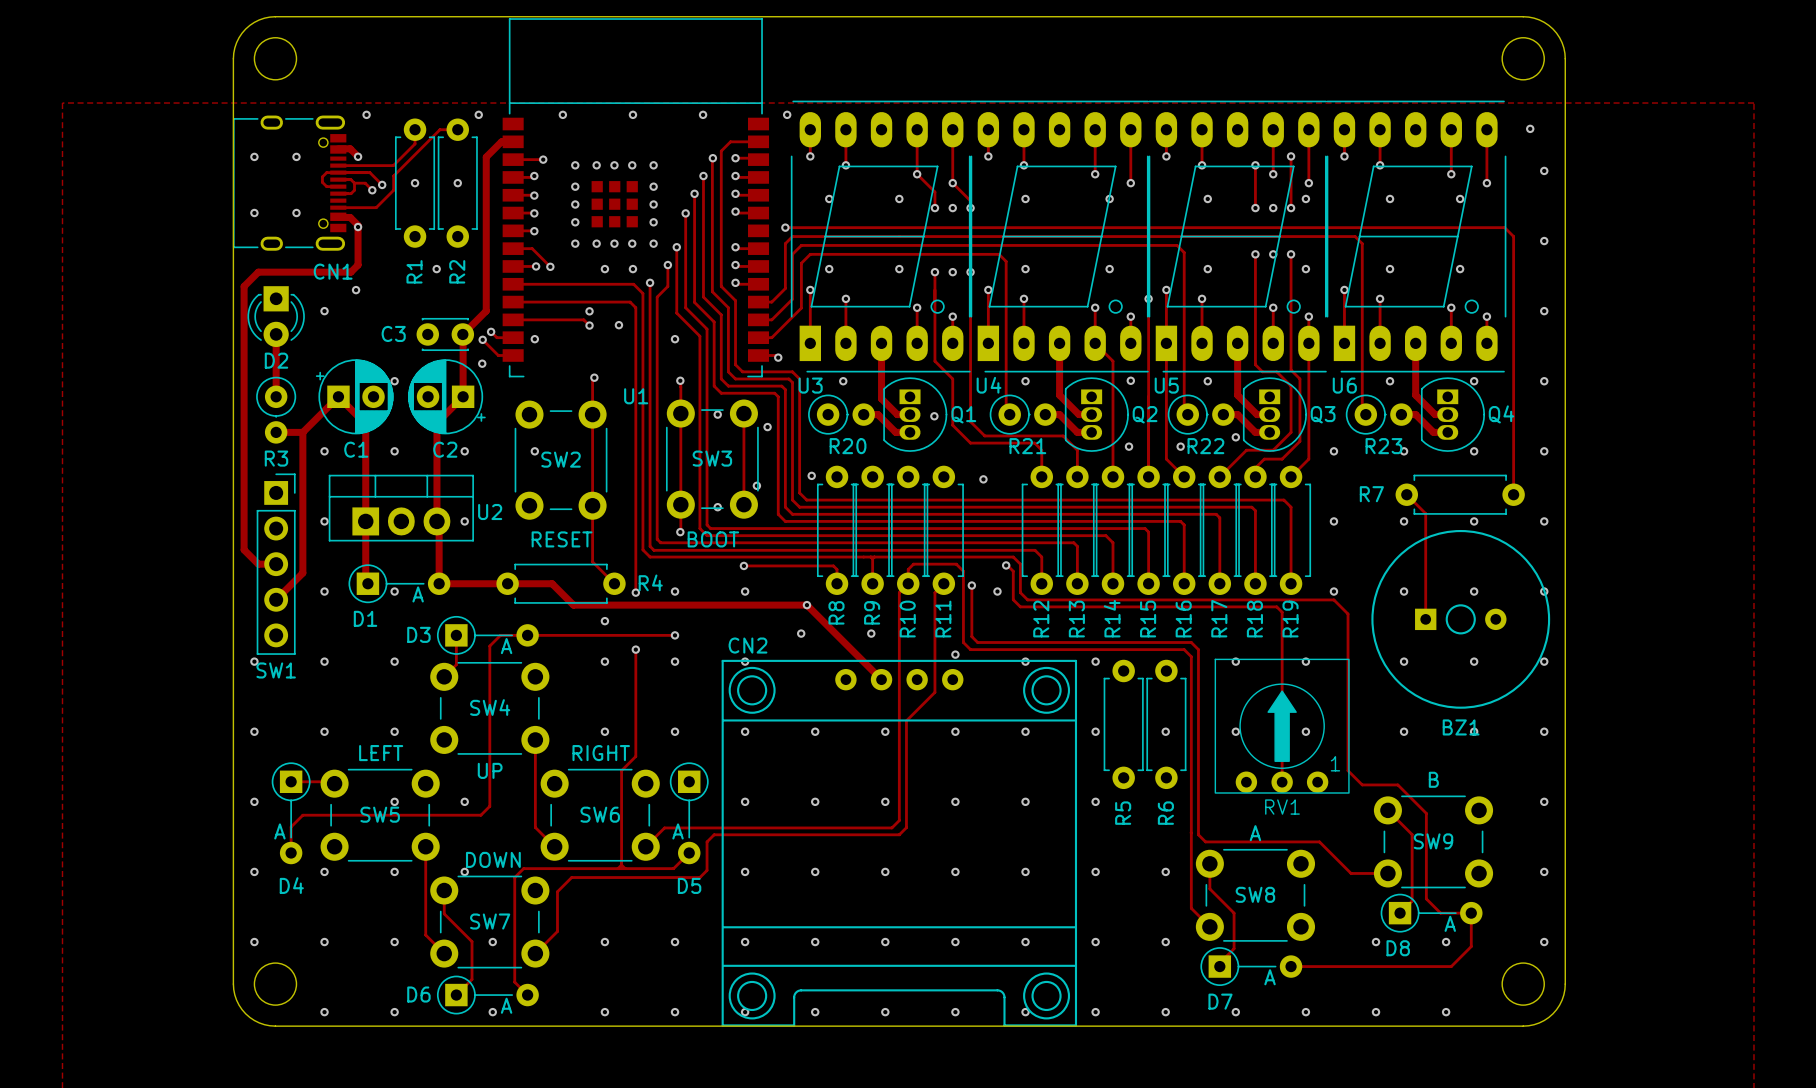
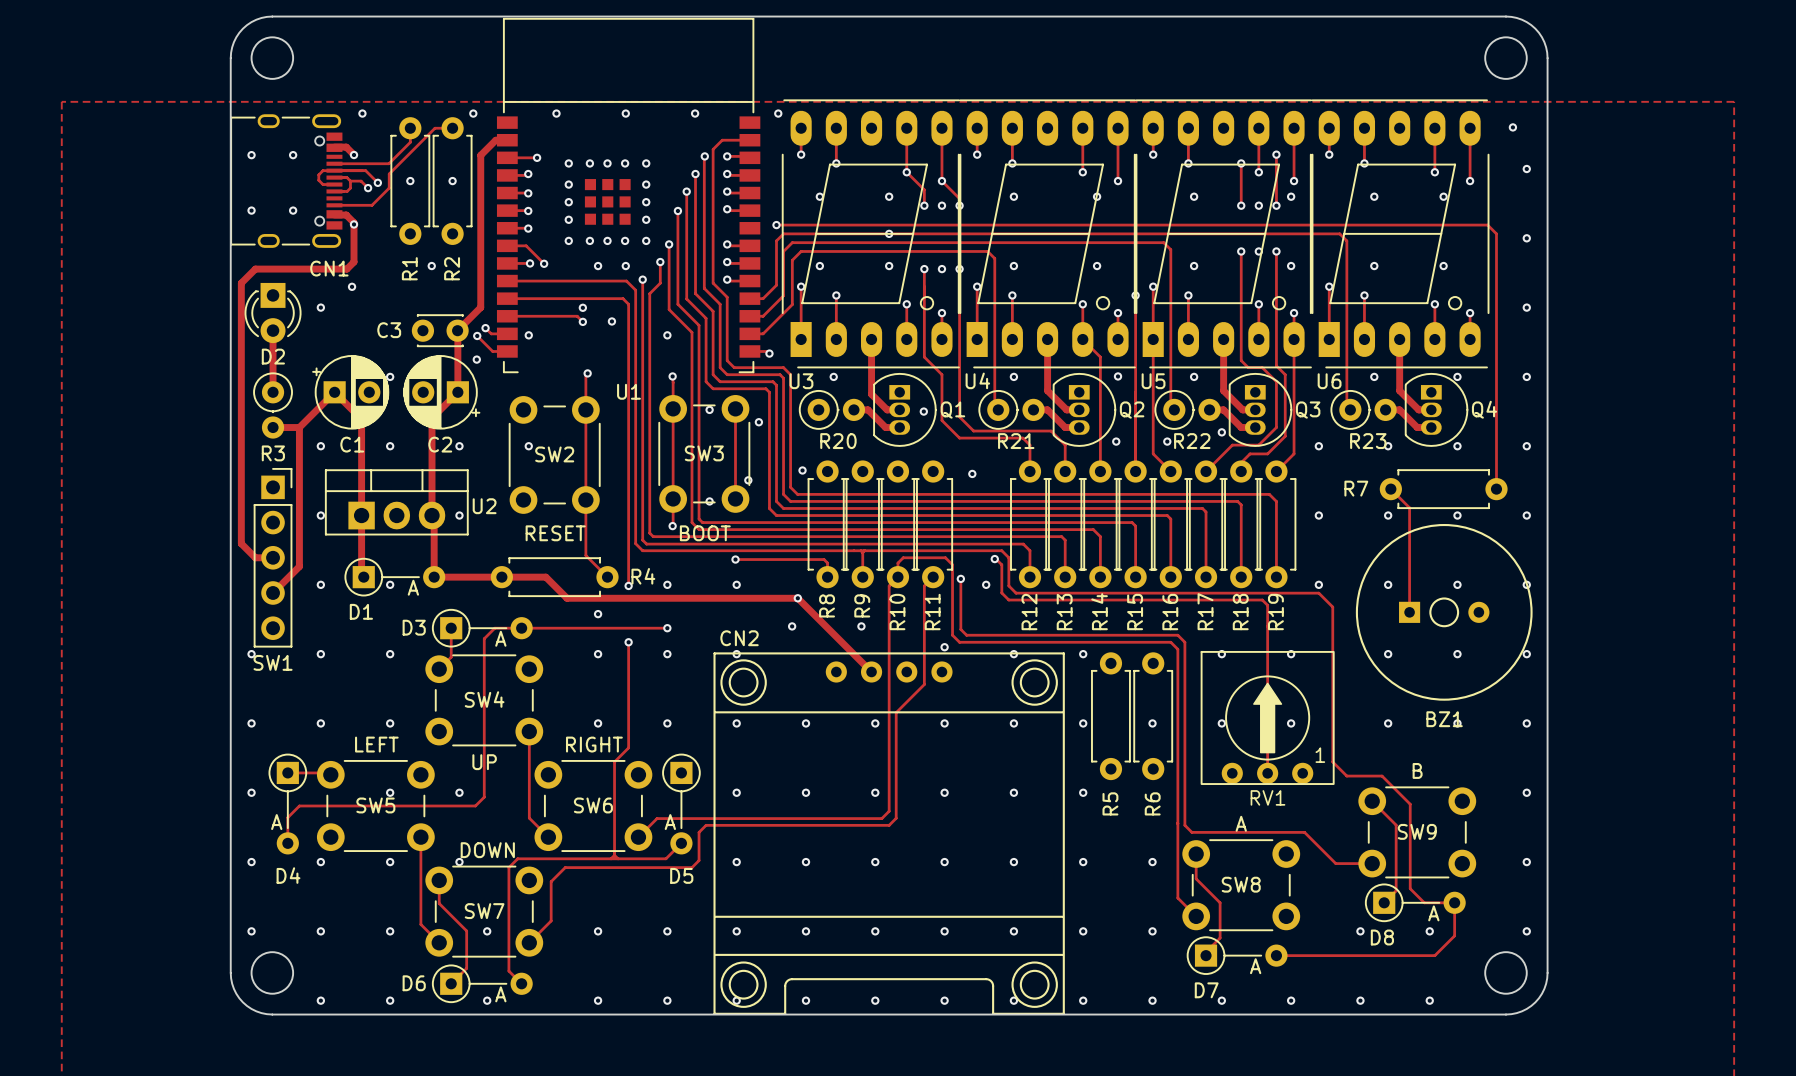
via: none -> (889, 233)

